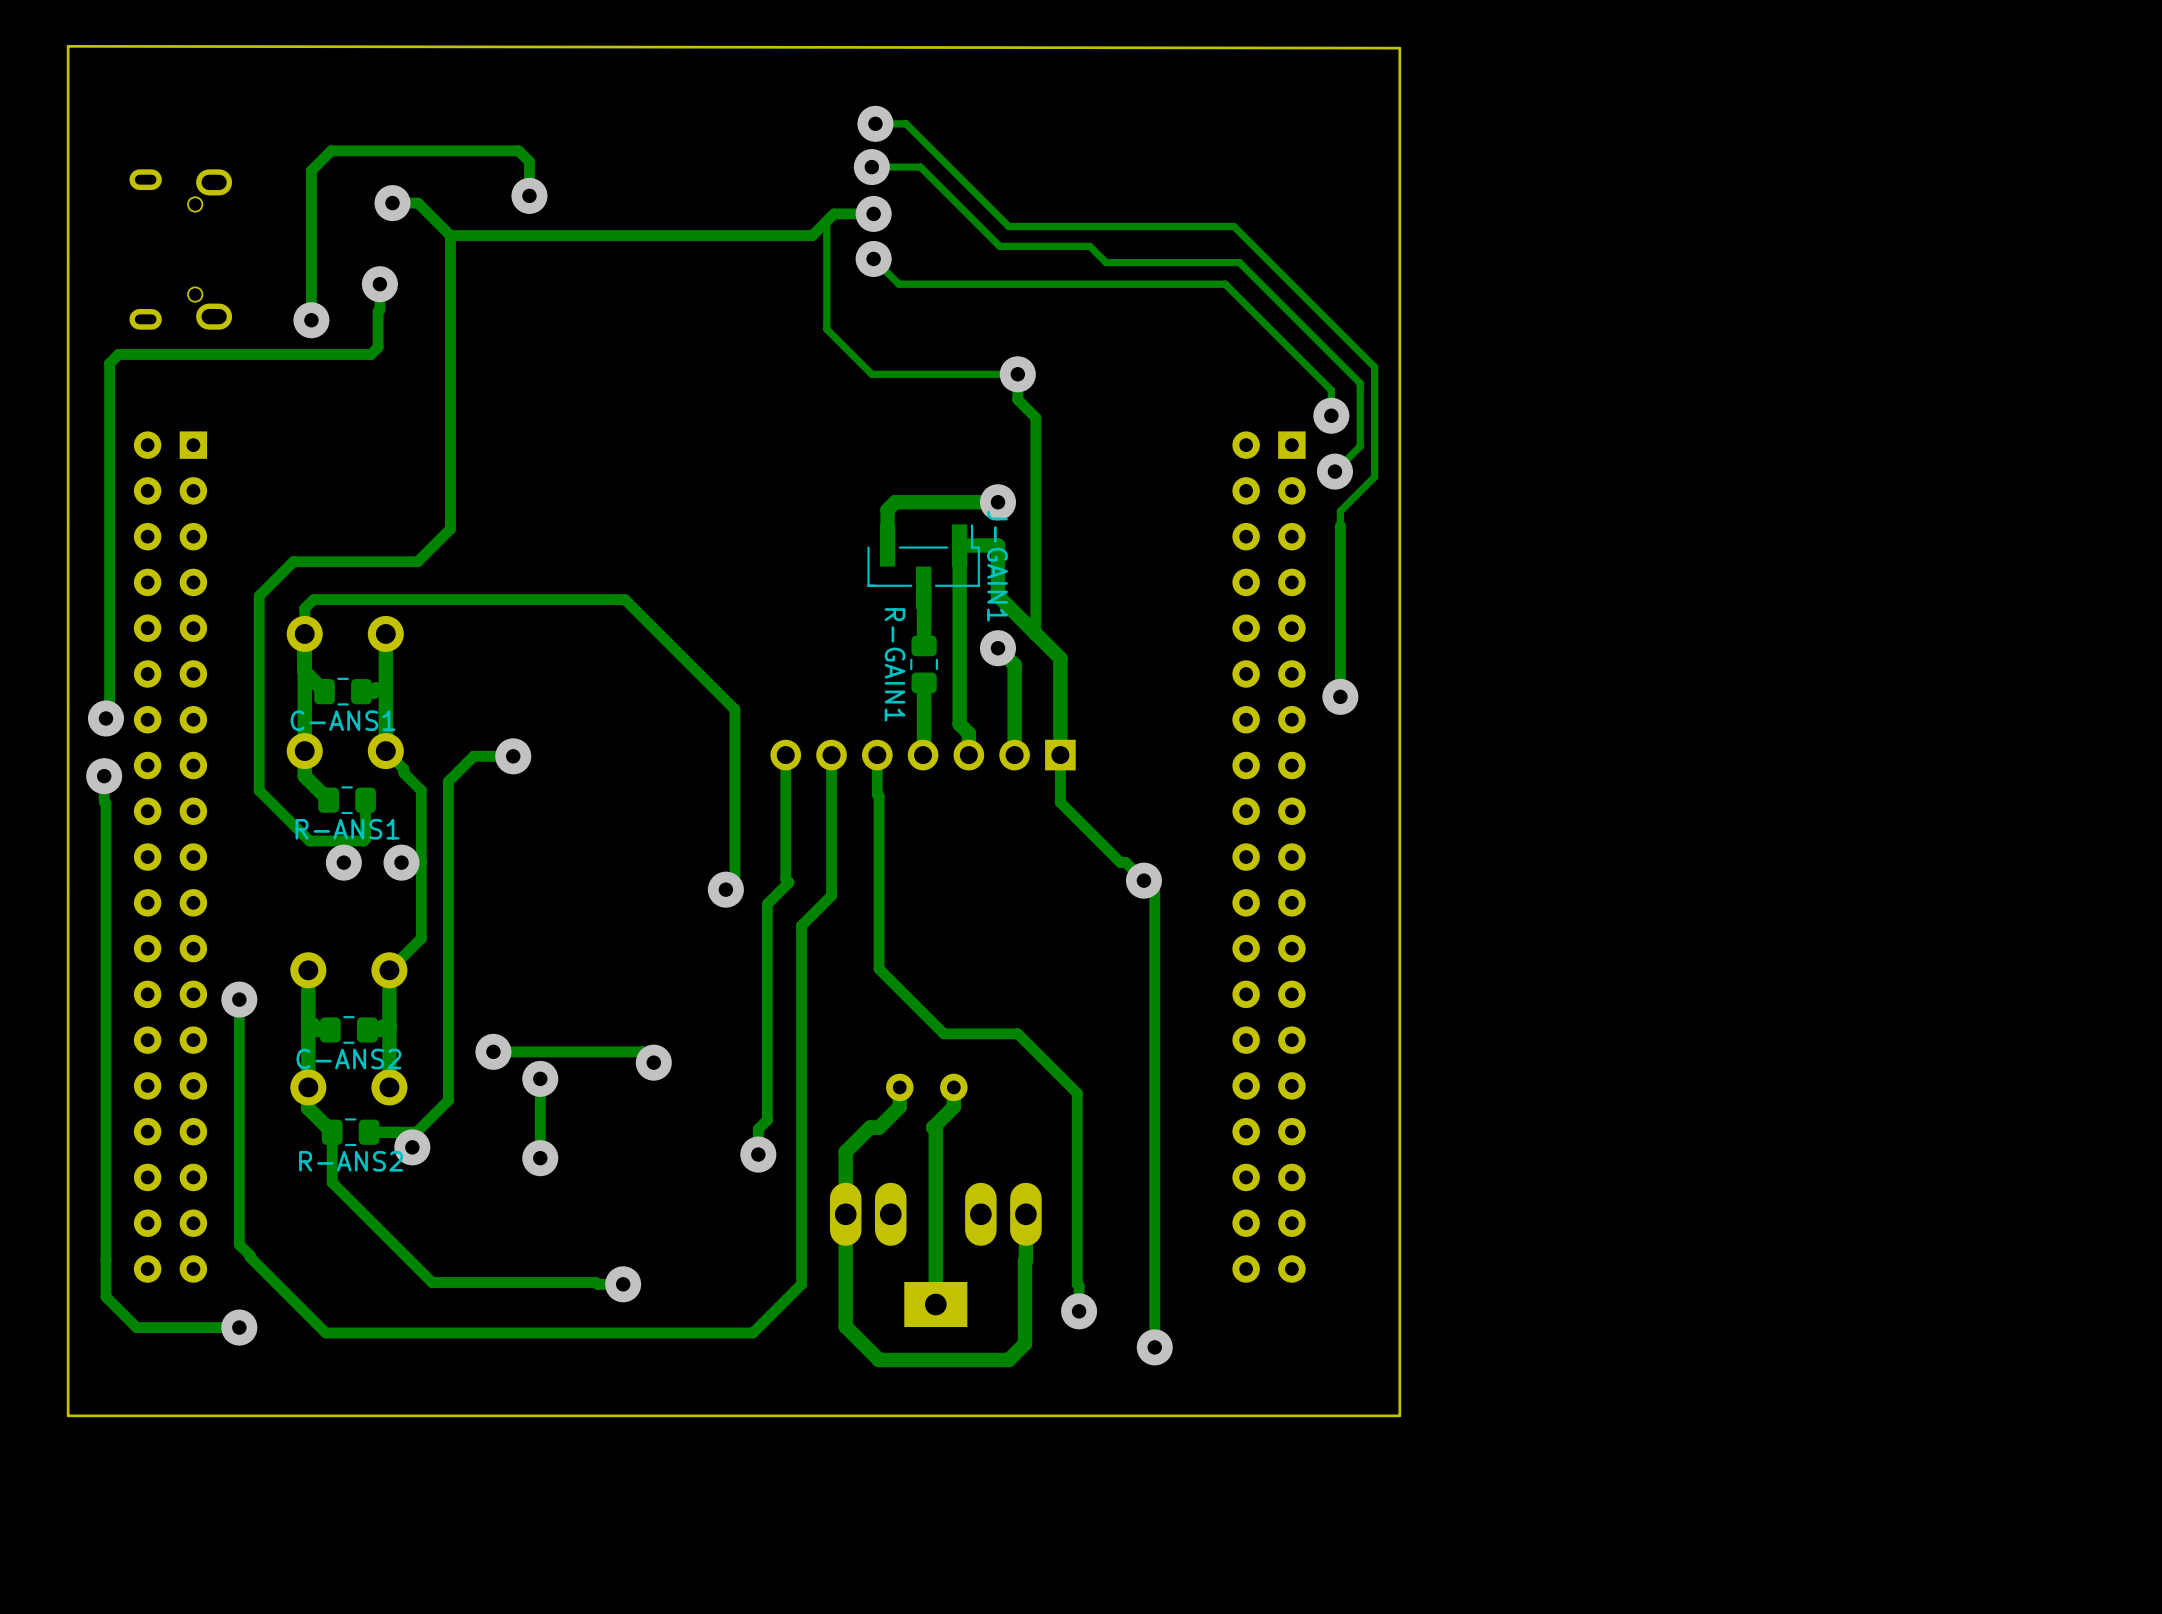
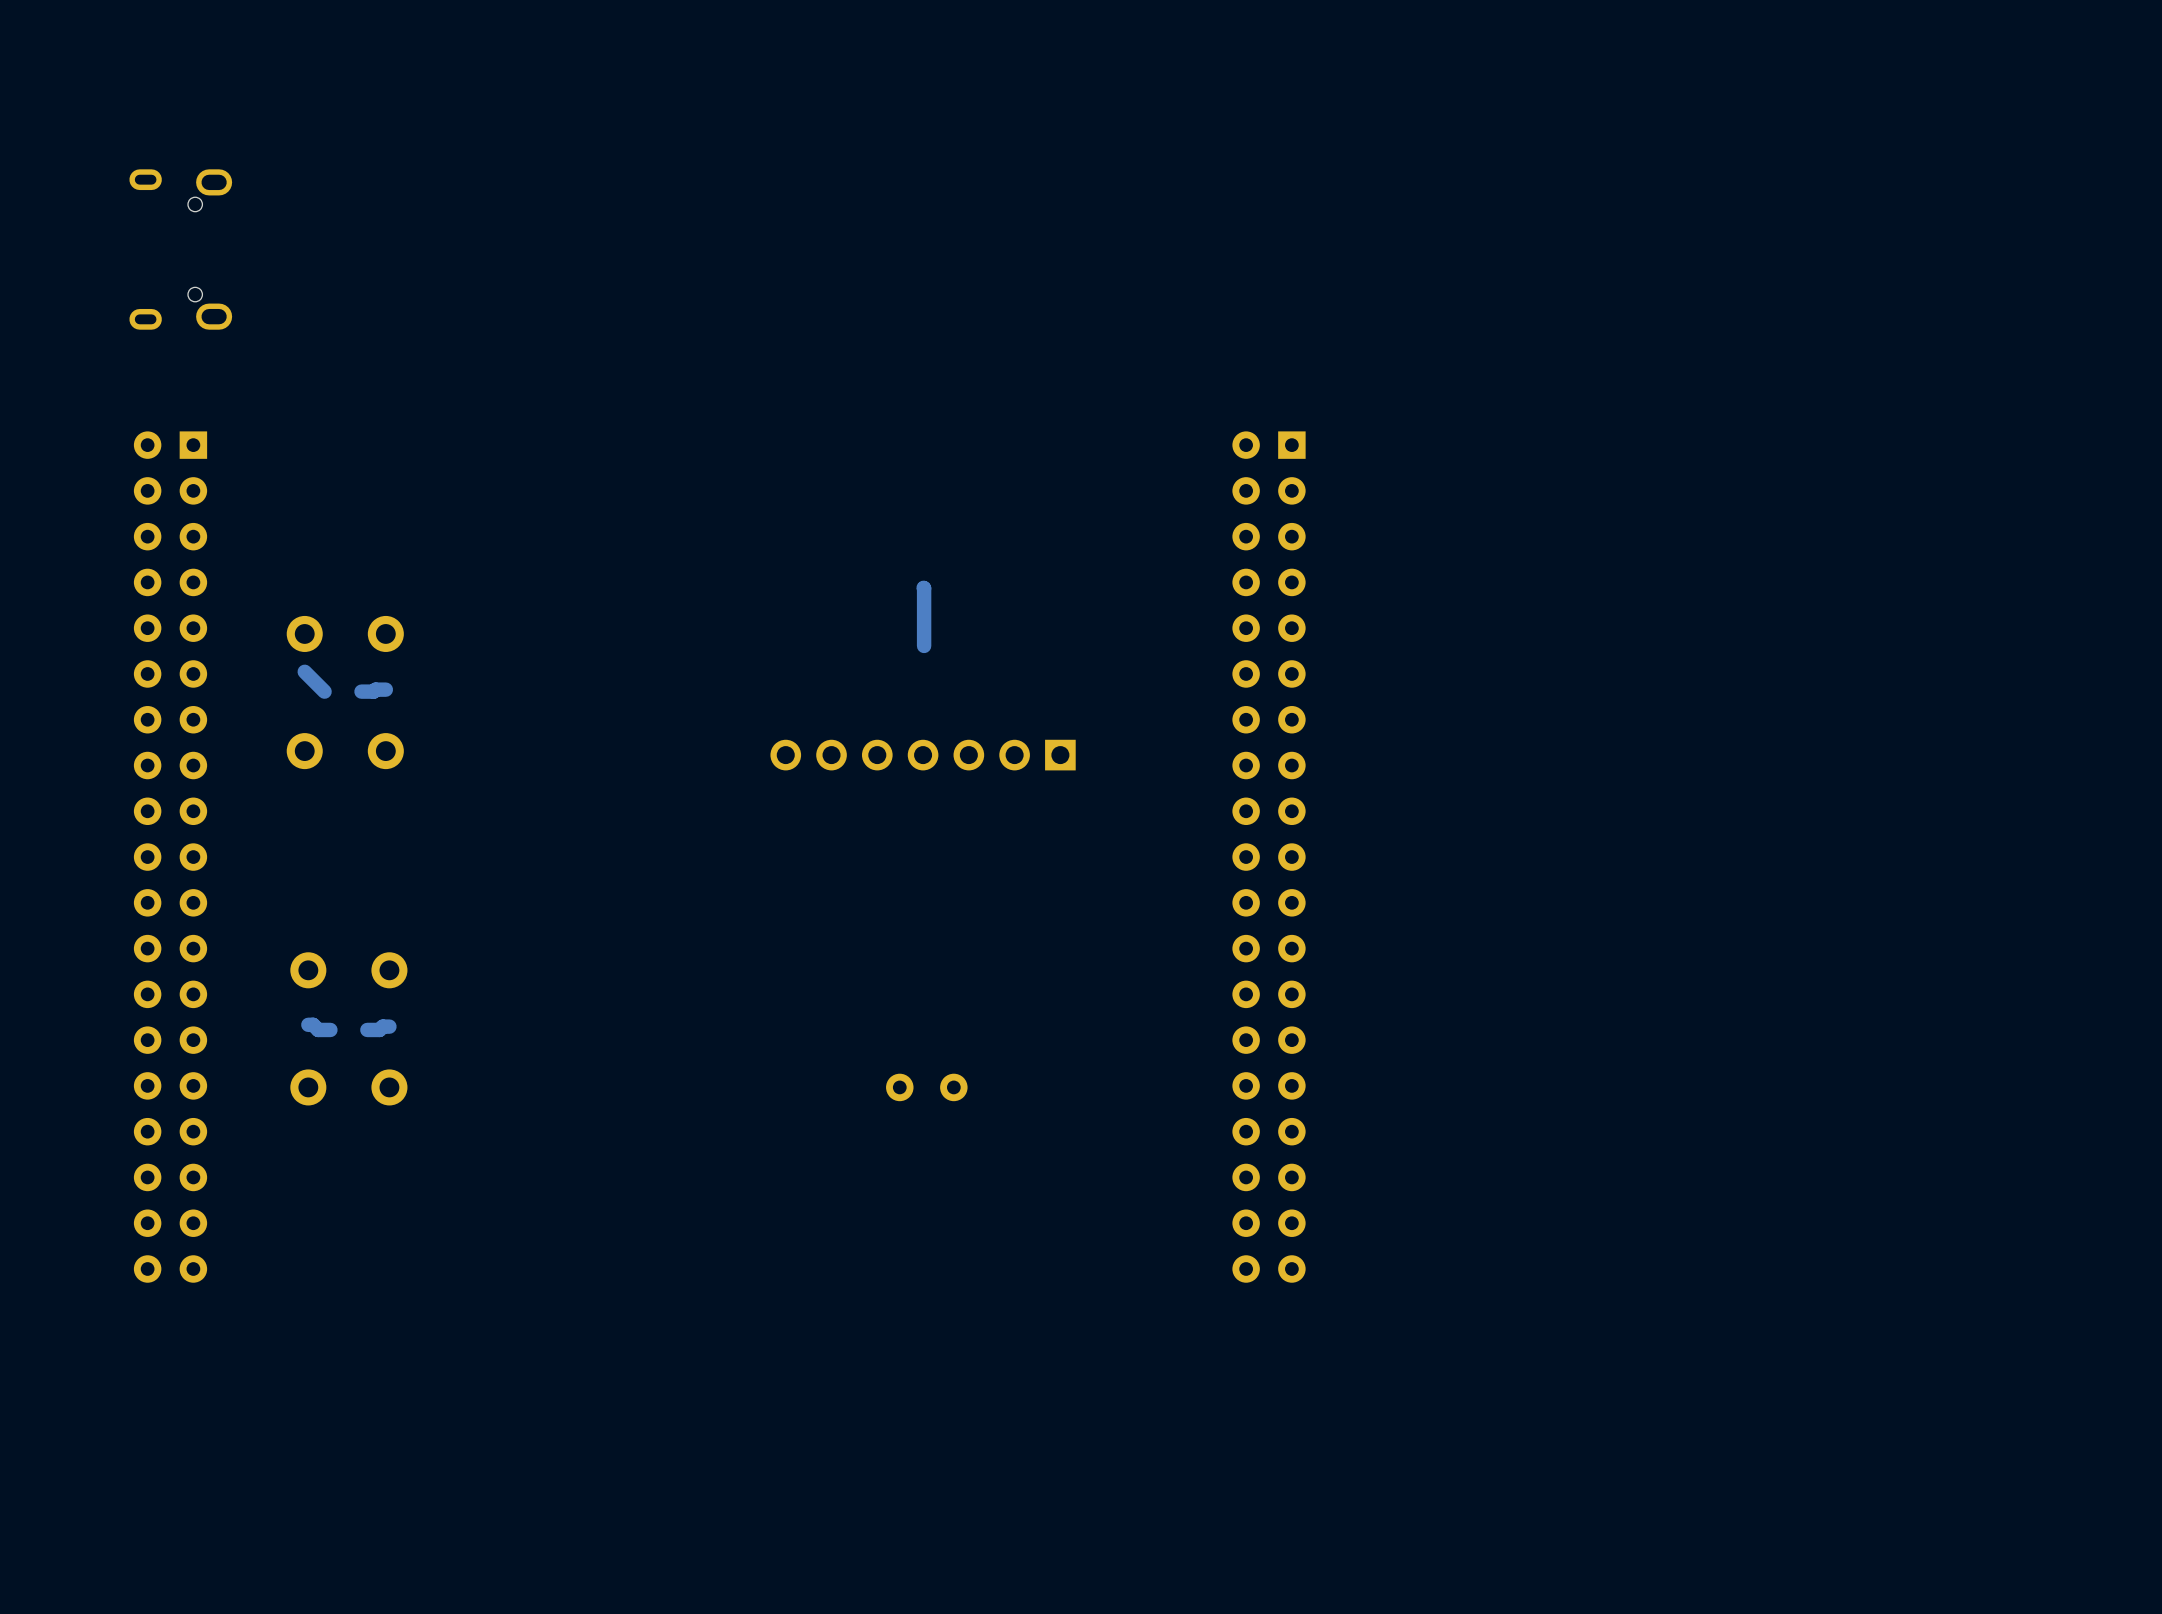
board edge: (68, 46) (68, 1415) (1399, 1415) (1399, 48) (68, 46) -> none
track: (875, 123) (906, 123) (1008, 226) (1234, 226) (1374, 367) (1374, 477) (1340, 511) (1340, 696) -> none
via: (875, 123) -> none
track: (871, 167) (920, 167) (999, 246) (1089, 246) (1106, 262) (1239, 262) (1360, 383) (1360, 446) (1334, 471) -> none
via: (871, 167) -> none
track: (529, 195) (529, 161) (518, 150) (331, 150) (311, 170) (311, 320) -> none
via: (529, 195) -> none
track: (392, 203) (418, 203) (450, 235) -> none
via: (392, 203) -> none
track: (873, 213) (834, 213) (812, 235) (450, 235) -> none
via: (873, 213) -> none
track: (830, 217) (826, 221) (826, 329) (871, 374) (1017, 374) (1017, 399) (1035, 417) (1035, 633) -> none
track: (450, 235) (450, 529) (417, 561) (293, 561) (259, 595) (259, 790) (309, 841) (363, 841) (365, 839) (365, 800) -> none
track: (873, 258) (898, 284) (1225, 284) (1331, 390) (1331, 415) -> none
via: (873, 258) -> none
track: (379, 284) (378, 347) (370, 354) (118, 354) (109, 363) (109, 714) (105, 718) -> none
via: (379, 284) -> none
via: (311, 320) -> none
via: (1017, 374) -> none
via: (1331, 415) -> none
via: (1334, 471) -> none
track: (997, 502) (895, 502) (887, 509) (887, 545) -> none
via: (997, 502) -> none
J-GAIN1: (923, 566) -> none
track: (385, 633) (385, 751) (421, 790) (421, 938) (389, 970) (389, 1087) -> none
track: (997, 648) (1014, 664) (1014, 755) -> none
via: (997, 648) -> none
R-GAIN1: (924, 664) -> none
track: (924, 682) (923, 755) -> none
C-ANS1: (343, 691) -> none
via: (1340, 696) -> none
via: (105, 718) -> none
track: (785, 755) (785, 879) (788, 882) (767, 904) (767, 1120) (758, 1129) (758, 1154) -> none
track: (831, 755) (831, 895) (801, 925) (801, 1284) (752, 1332) (325, 1332) (239, 1244) (239, 999) -> none
track: (877, 755) (879, 968) (943, 1033) (1017, 1033) (1077, 1093) (1077, 1284) (1079, 1285) (1079, 1311) -> none
track: (968, 755) (968, 733) (959, 724) (959, 545) (997, 545) (997, 595) (1060, 658) (1060, 802) (1120, 862) (1125, 862) (1154, 891) (1154, 1347) -> none
track: (513, 756) (473, 756) (448, 781) (448, 1100) (416, 1132) (369, 1132) -> none
via: (513, 756) -> none
track: (104, 776) (104, 801) (105, 803) (105, 1296) (136, 1327) (239, 1327) -> none
via: (104, 776) -> none
track: (328, 800) (304, 776) (304, 608) (313, 599) (624, 599) (734, 709) (734, 880) (725, 889) -> none
R-ANS1: (347, 800) -> none
via: (343, 862) -> none
via: (401, 862) -> none
via: (1143, 880) -> none
via: (725, 889) -> none
track: (308, 970) (308, 1108) (332, 1132) (332, 1182) (432, 1282) (595, 1282) (597, 1284) (623, 1284) -> none
via: (239, 999) -> none
C-ANS2: (348, 1029) -> none
track: (493, 1051) (642, 1051) (653, 1062) -> none
via: (493, 1051) -> none
via: (653, 1062) -> none
track: (540, 1078) (540, 1158) -> none
via: (540, 1078) -> none
track: (899, 1087) (899, 1106) (879, 1127) (870, 1127) (845, 1151) (845, 1326) (879, 1359) (1008, 1359) (1025, 1343) (1025, 1214) -> none
track: (953, 1087) (953, 1106) (933, 1127) (935, 1130) (935, 1304) -> none
R-ANS2: (350, 1132) -> none
via: (412, 1147) -> none
via: (758, 1154) -> none
via: (540, 1158) -> none
part: (935, 1254) -> none
via: (623, 1284) -> none
via: (1079, 1311) -> none
via: (239, 1327) -> none
via: (1154, 1347) -> none

